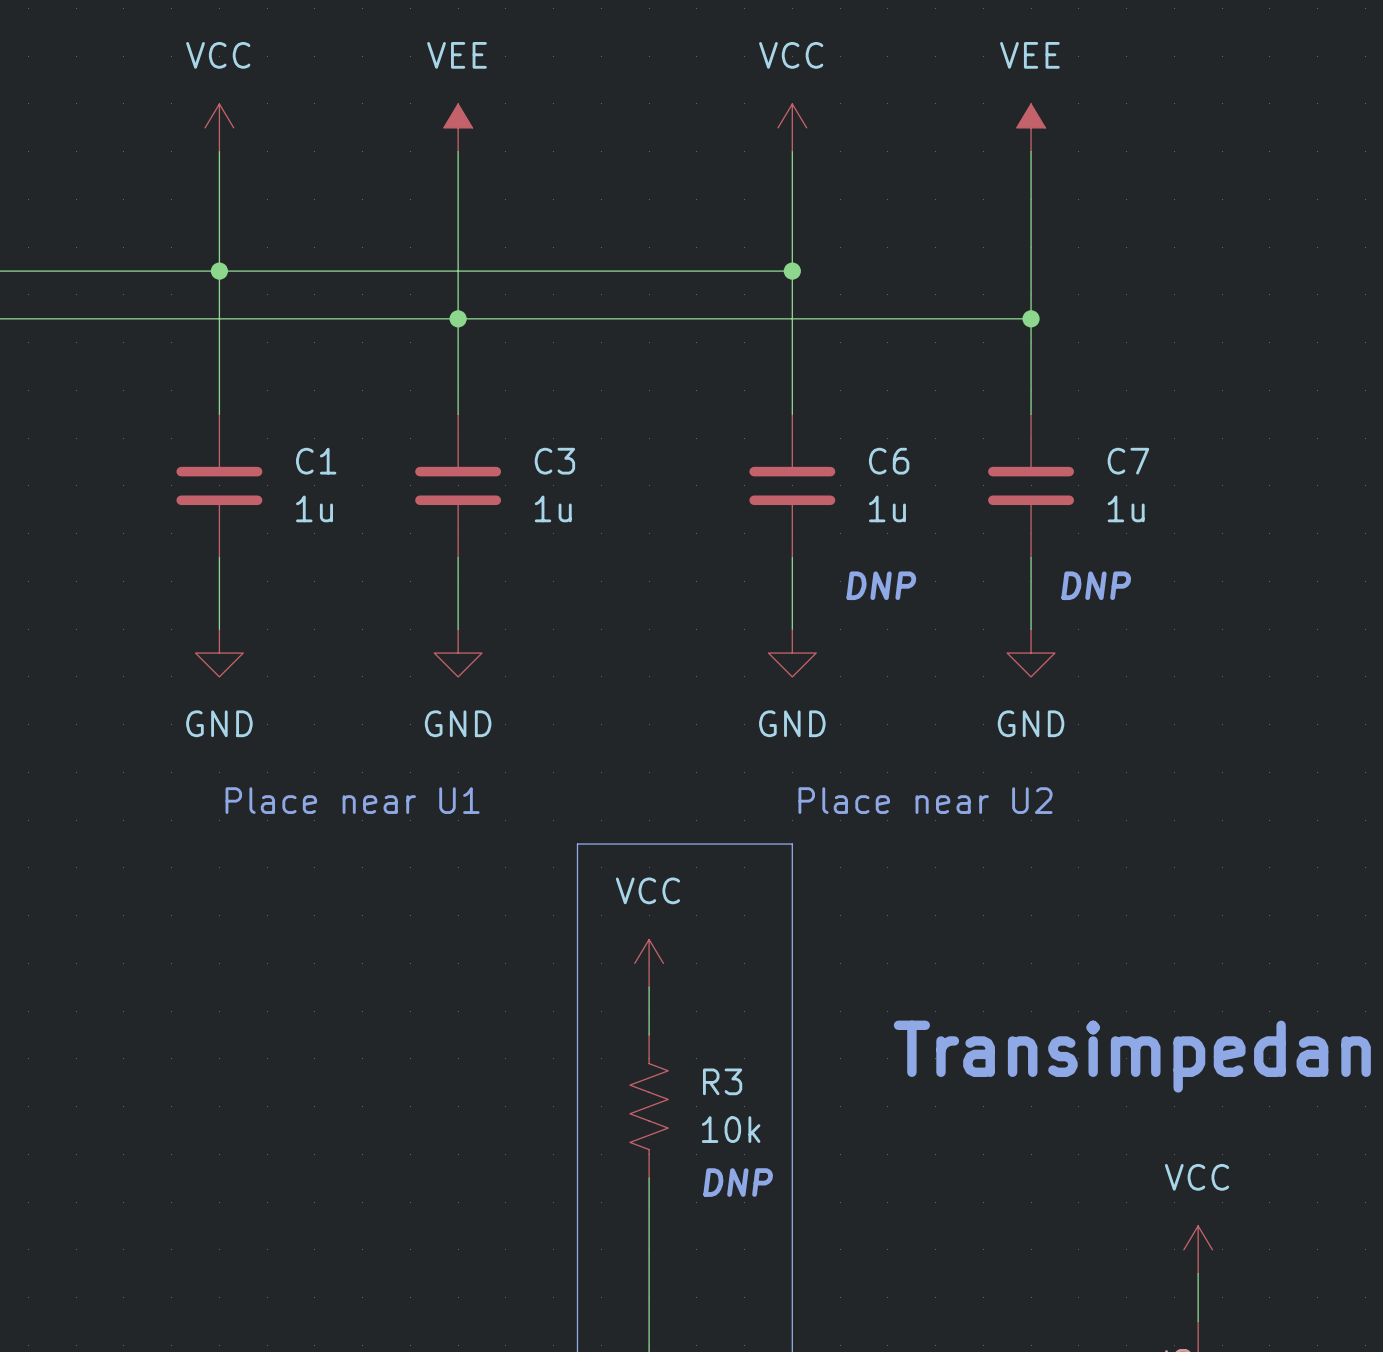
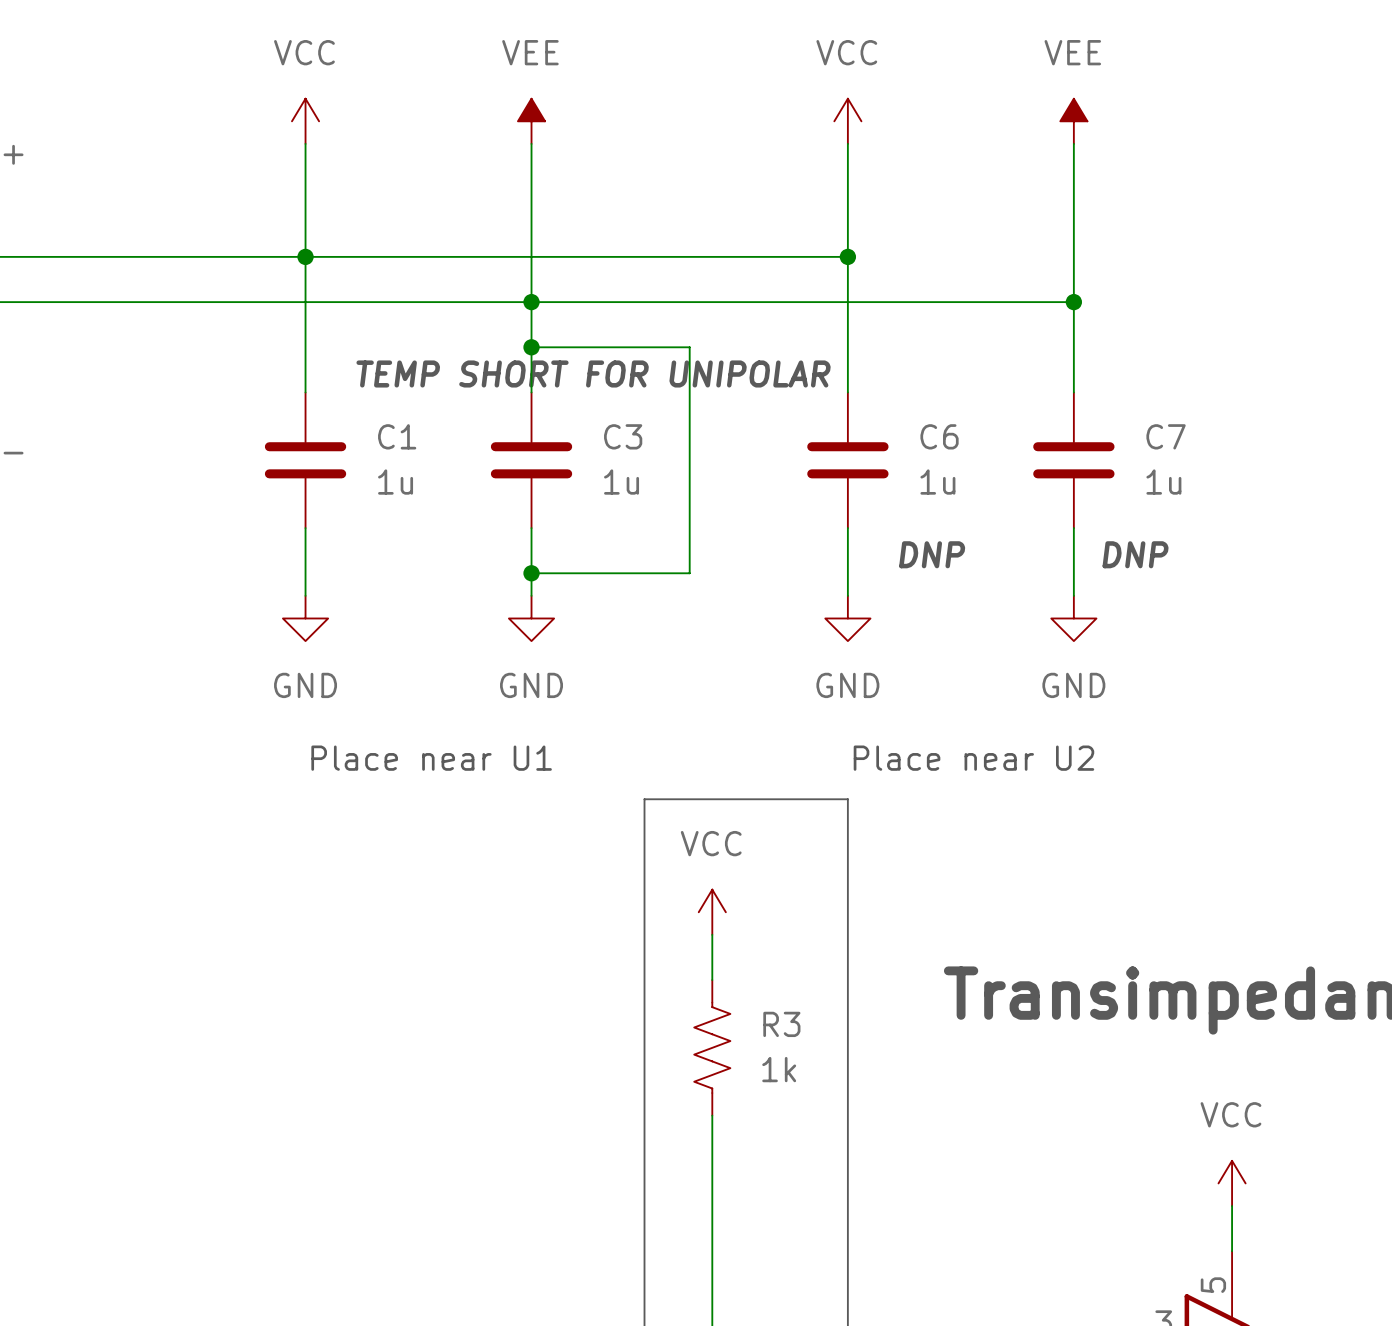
wire: none -> (531, 347) (689, 347) (689, 573) (531, 573)
junction: none -> (531, 347)
text: none -> TEMP SHORT FOR UNIPOLAR (593, 373)
junction: none -> (531, 573)
R3 value: 10k (731, 1129) -> 1k (779, 1069)
text: DNP (738, 1182) -> none

